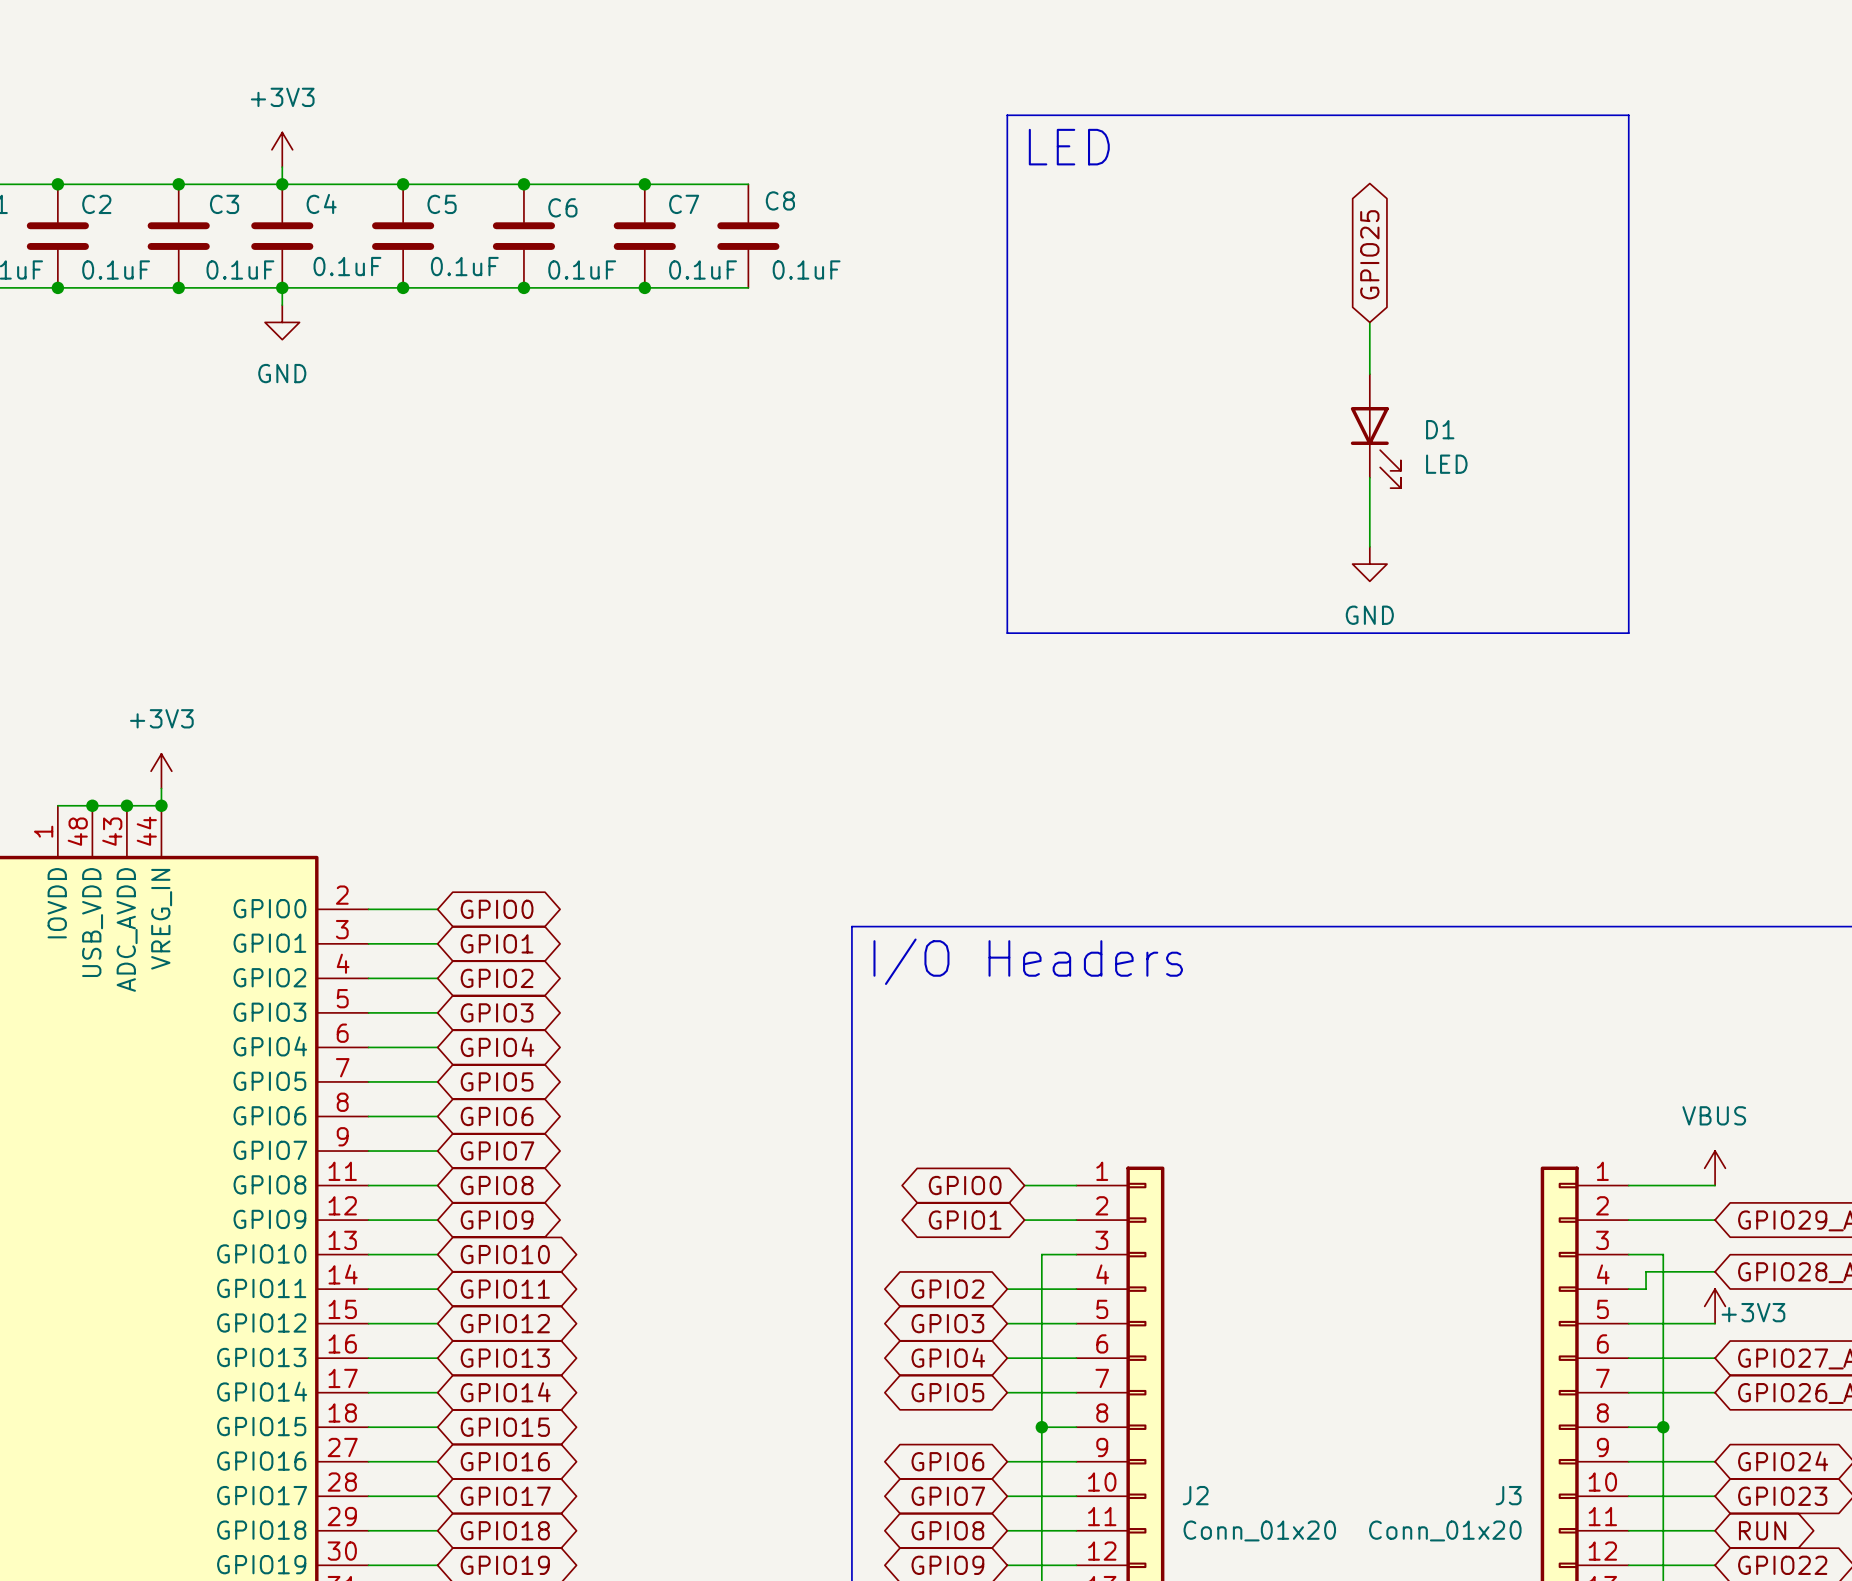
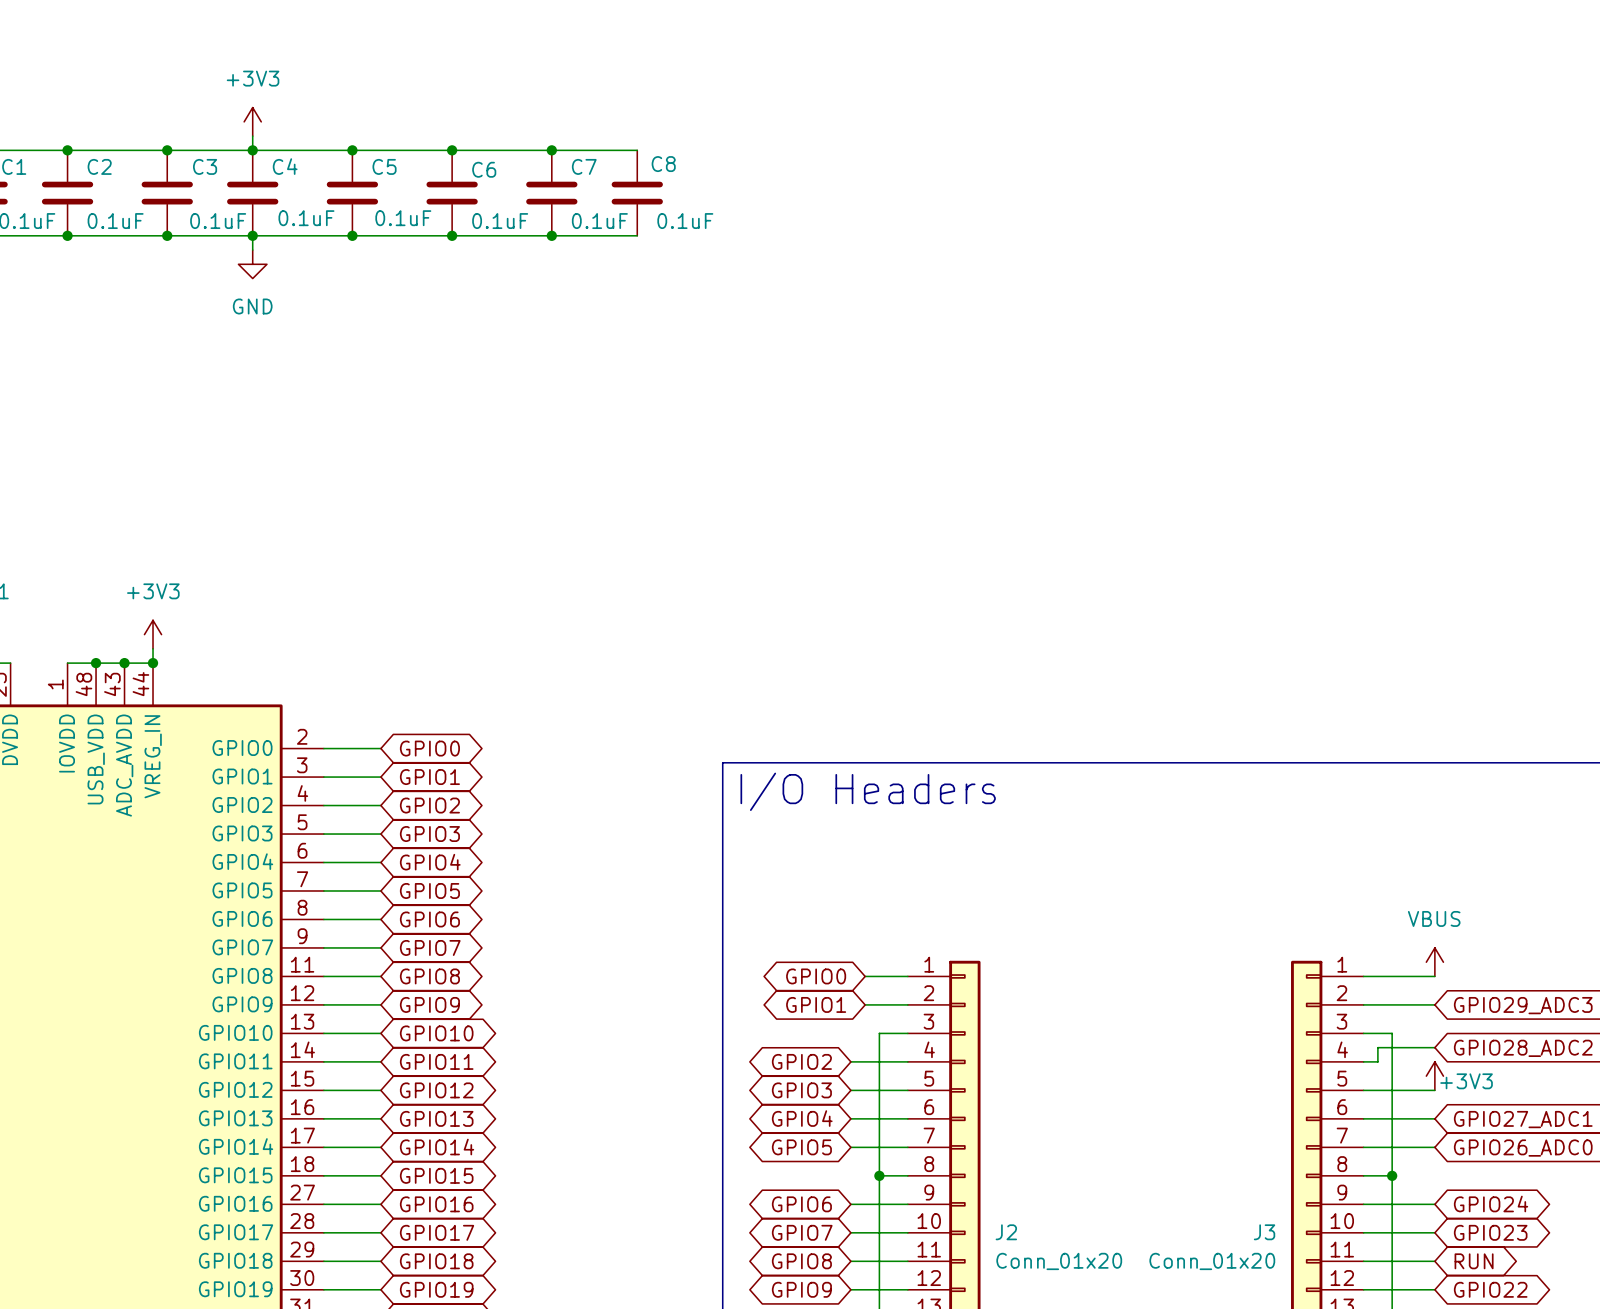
line: (1007, 115) (1628, 115) (1628, 633) (1007, 633) (1007, 115) -> none
text: LED (1069, 147) -> none
global label: GPIO25 (1369, 254) -> none
wire: (1369, 322) (1369, 374) -> none
D1: LED (1375, 431) -> none
wire: (1369, 477) (1369, 546) -> none
power symbol: GND (1369, 564) -> none

